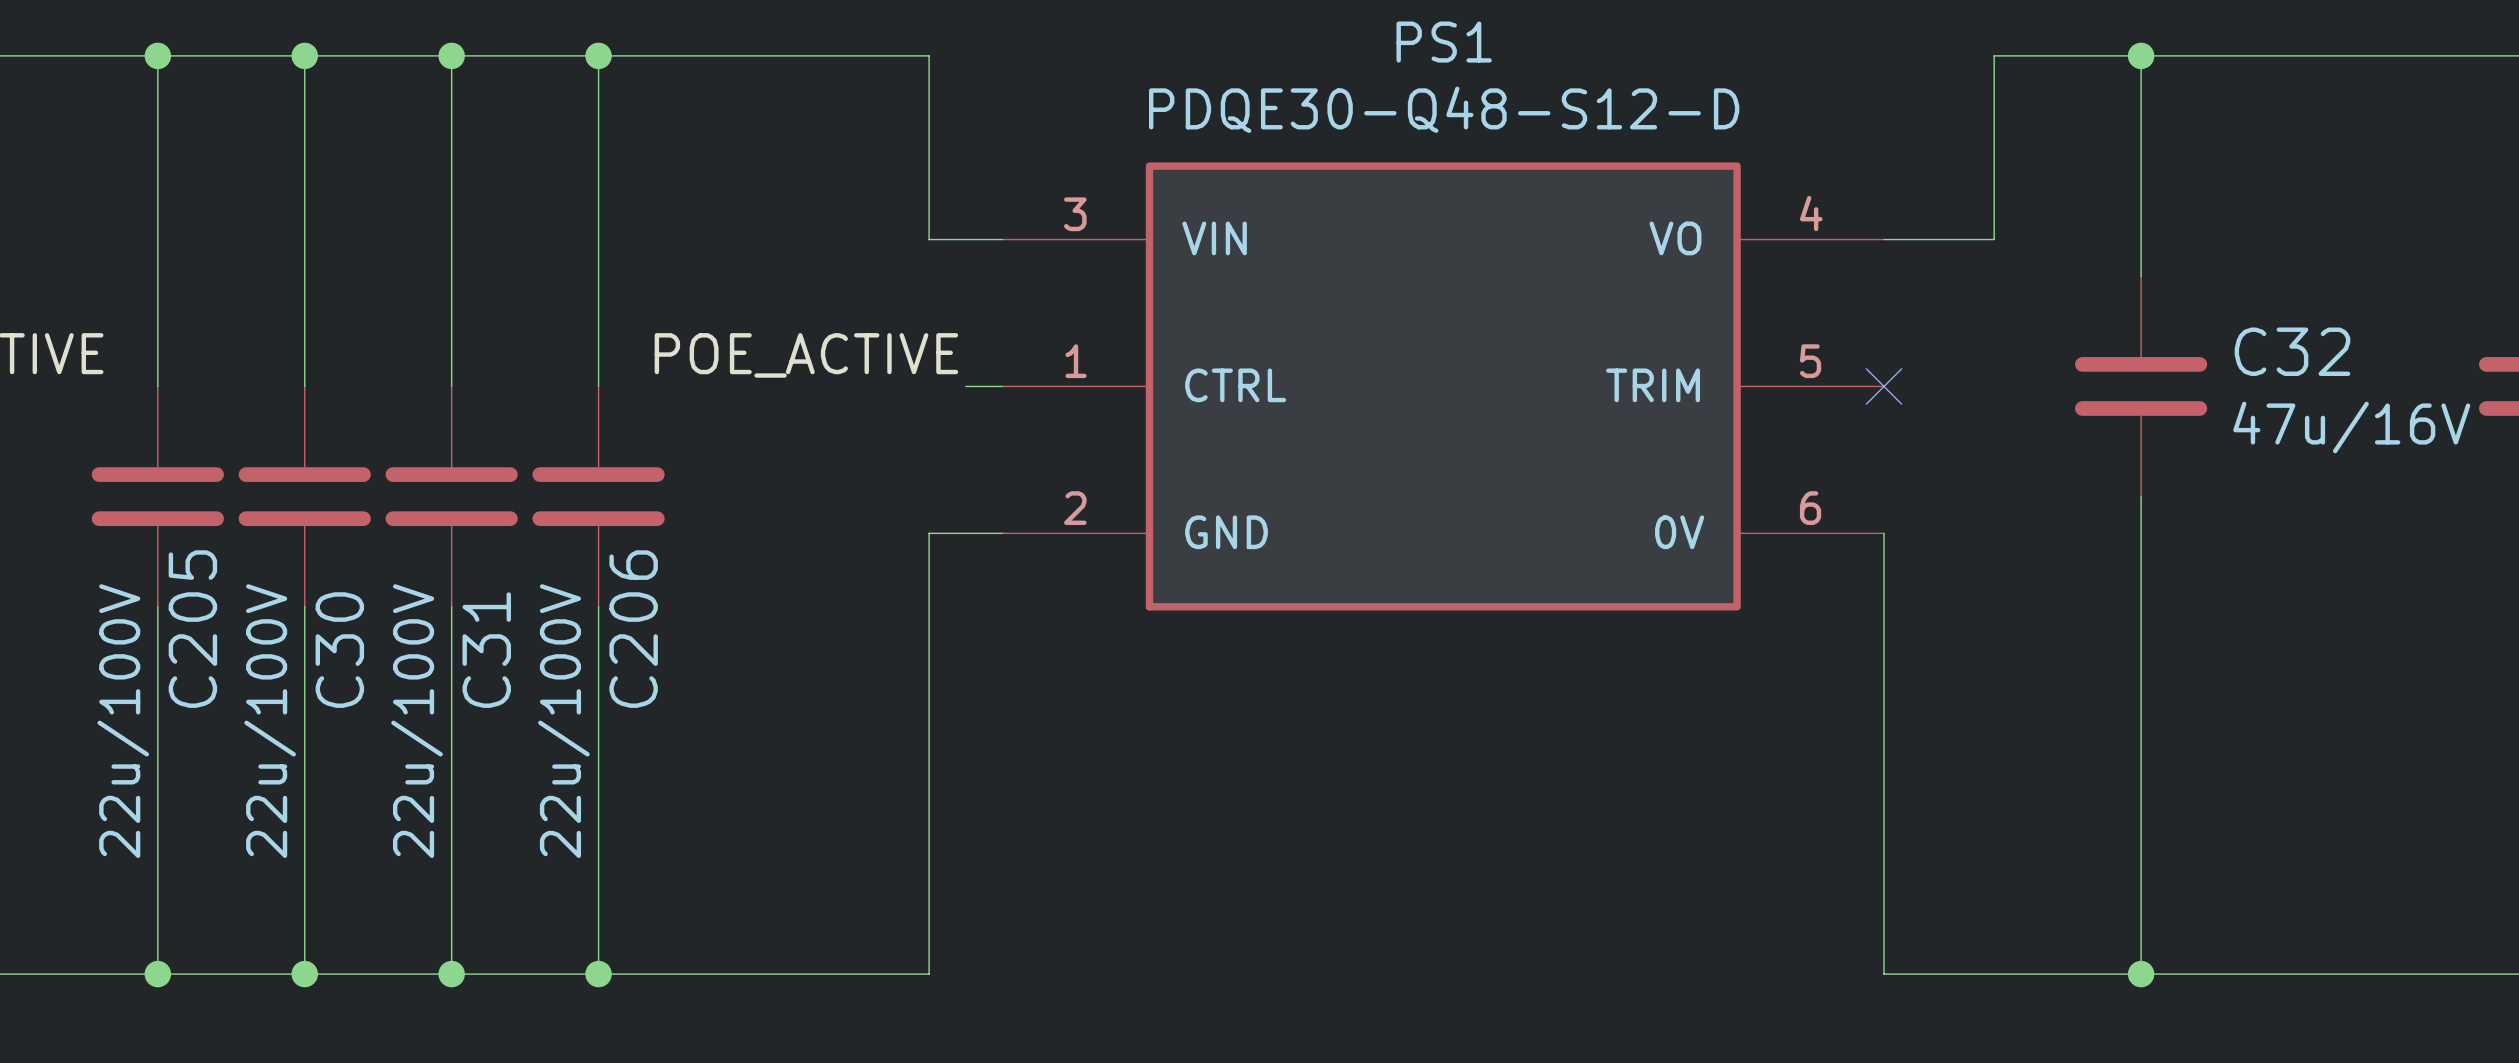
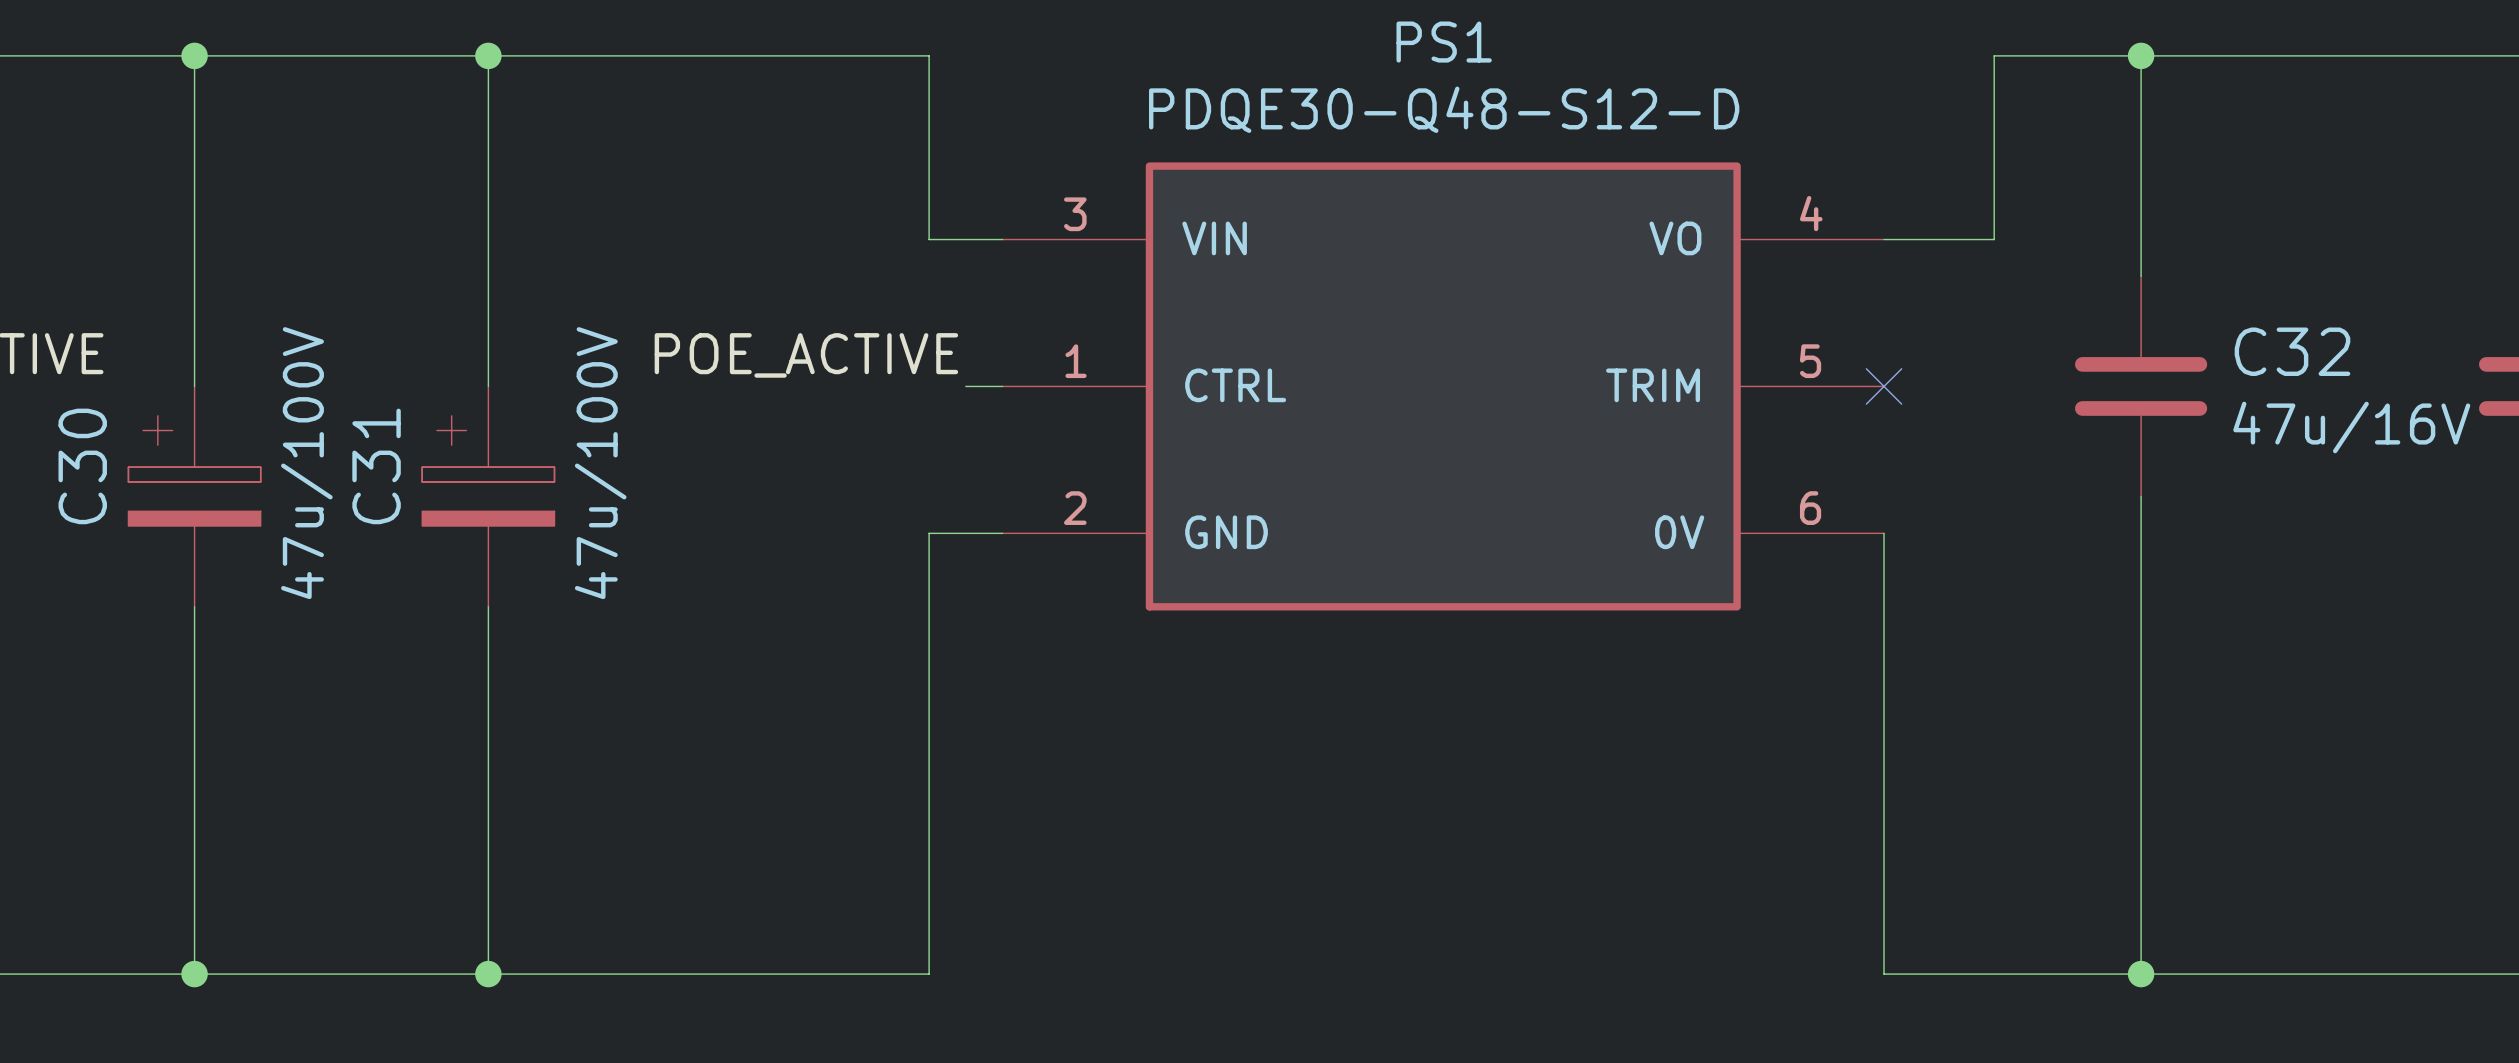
wire: (157, 55) (157, 386) -> (194, 55) (194, 386)
junction position: (157, 55) -> (194, 55)
wire: (304, 55) (304, 386) -> none
junction: (304, 55) -> none
wire: (451, 55) (451, 386) -> (488, 55) (488, 386)
junction position: (451, 55) -> (488, 55)
wire: (598, 55) (598, 386) -> none
junction: (598, 55) -> none
C30 symbol: [238, 386, 371, 607] -> [128, 386, 261, 607]
C31 symbol: [385, 386, 518, 607] -> [422, 386, 555, 607]
C205: (157, 496) -> none
C206: (598, 496) -> none
wire: (157, 606) (157, 974) -> (194, 606) (194, 974)
wire: (304, 606) (304, 974) -> none
wire: (451, 606) (451, 974) -> (488, 606) (488, 974)
wire: (598, 606) (598, 974) -> none
C30 name position: C30 (339, 650) -> C30 (82, 466)
C31 name position: C31 (486, 650) -> C31 (376, 466)
C30 text: 22u/100V (270, 721) -> 47u/100V (306, 463)
C31 text: 22u/100V (417, 721) -> 47u/100V (600, 463)
junction position: (157, 974) -> (194, 974)
junction: (304, 974) -> none
junction position: (451, 974) -> (488, 974)
junction: (598, 974) -> none

